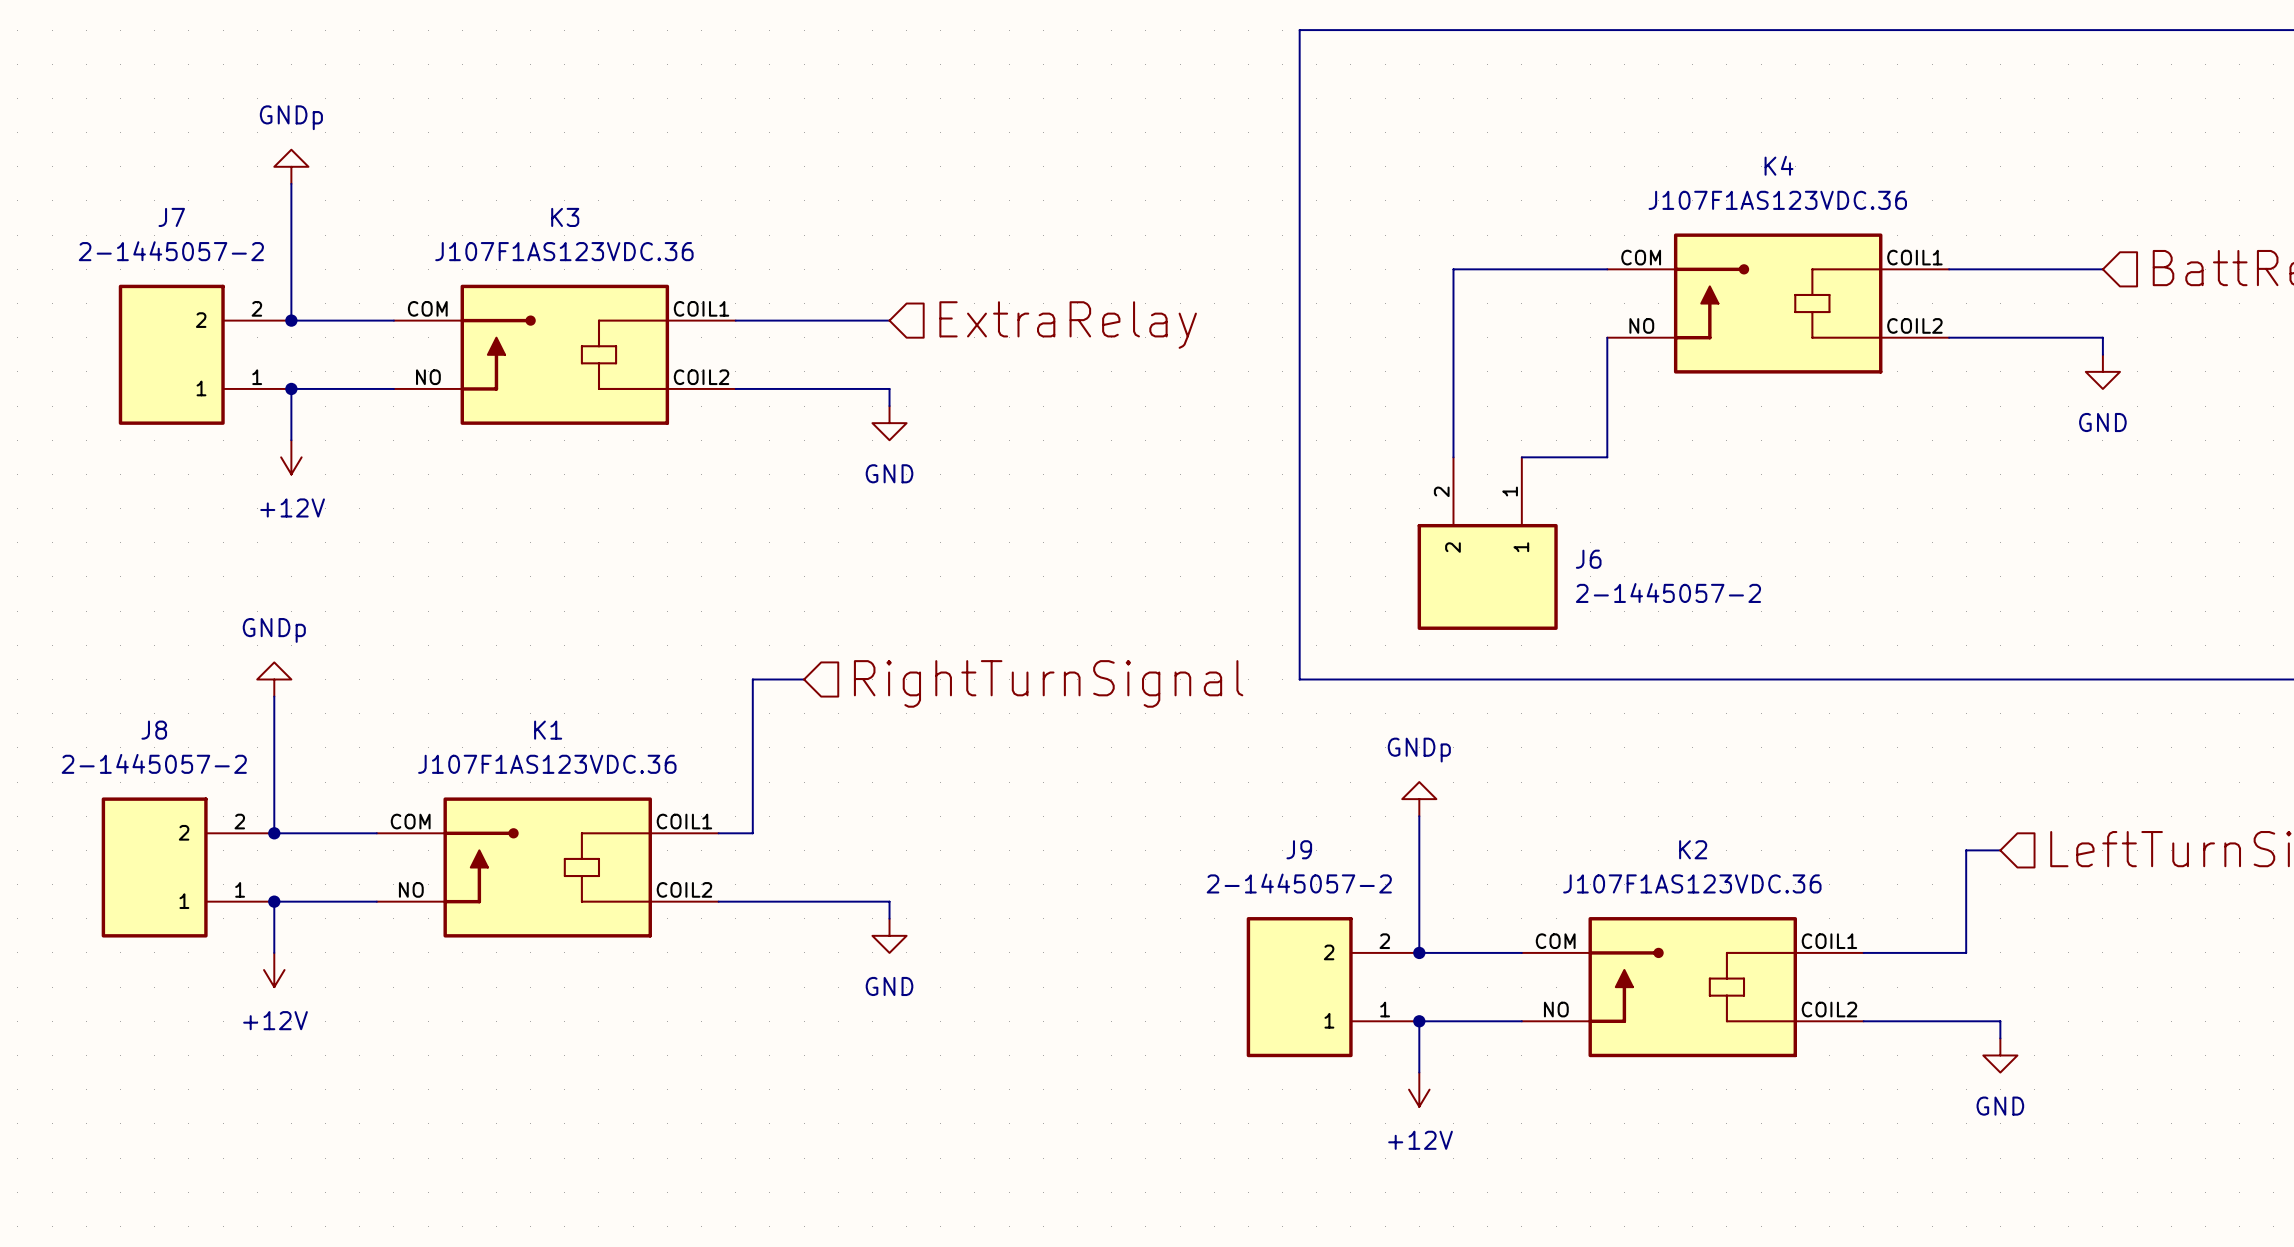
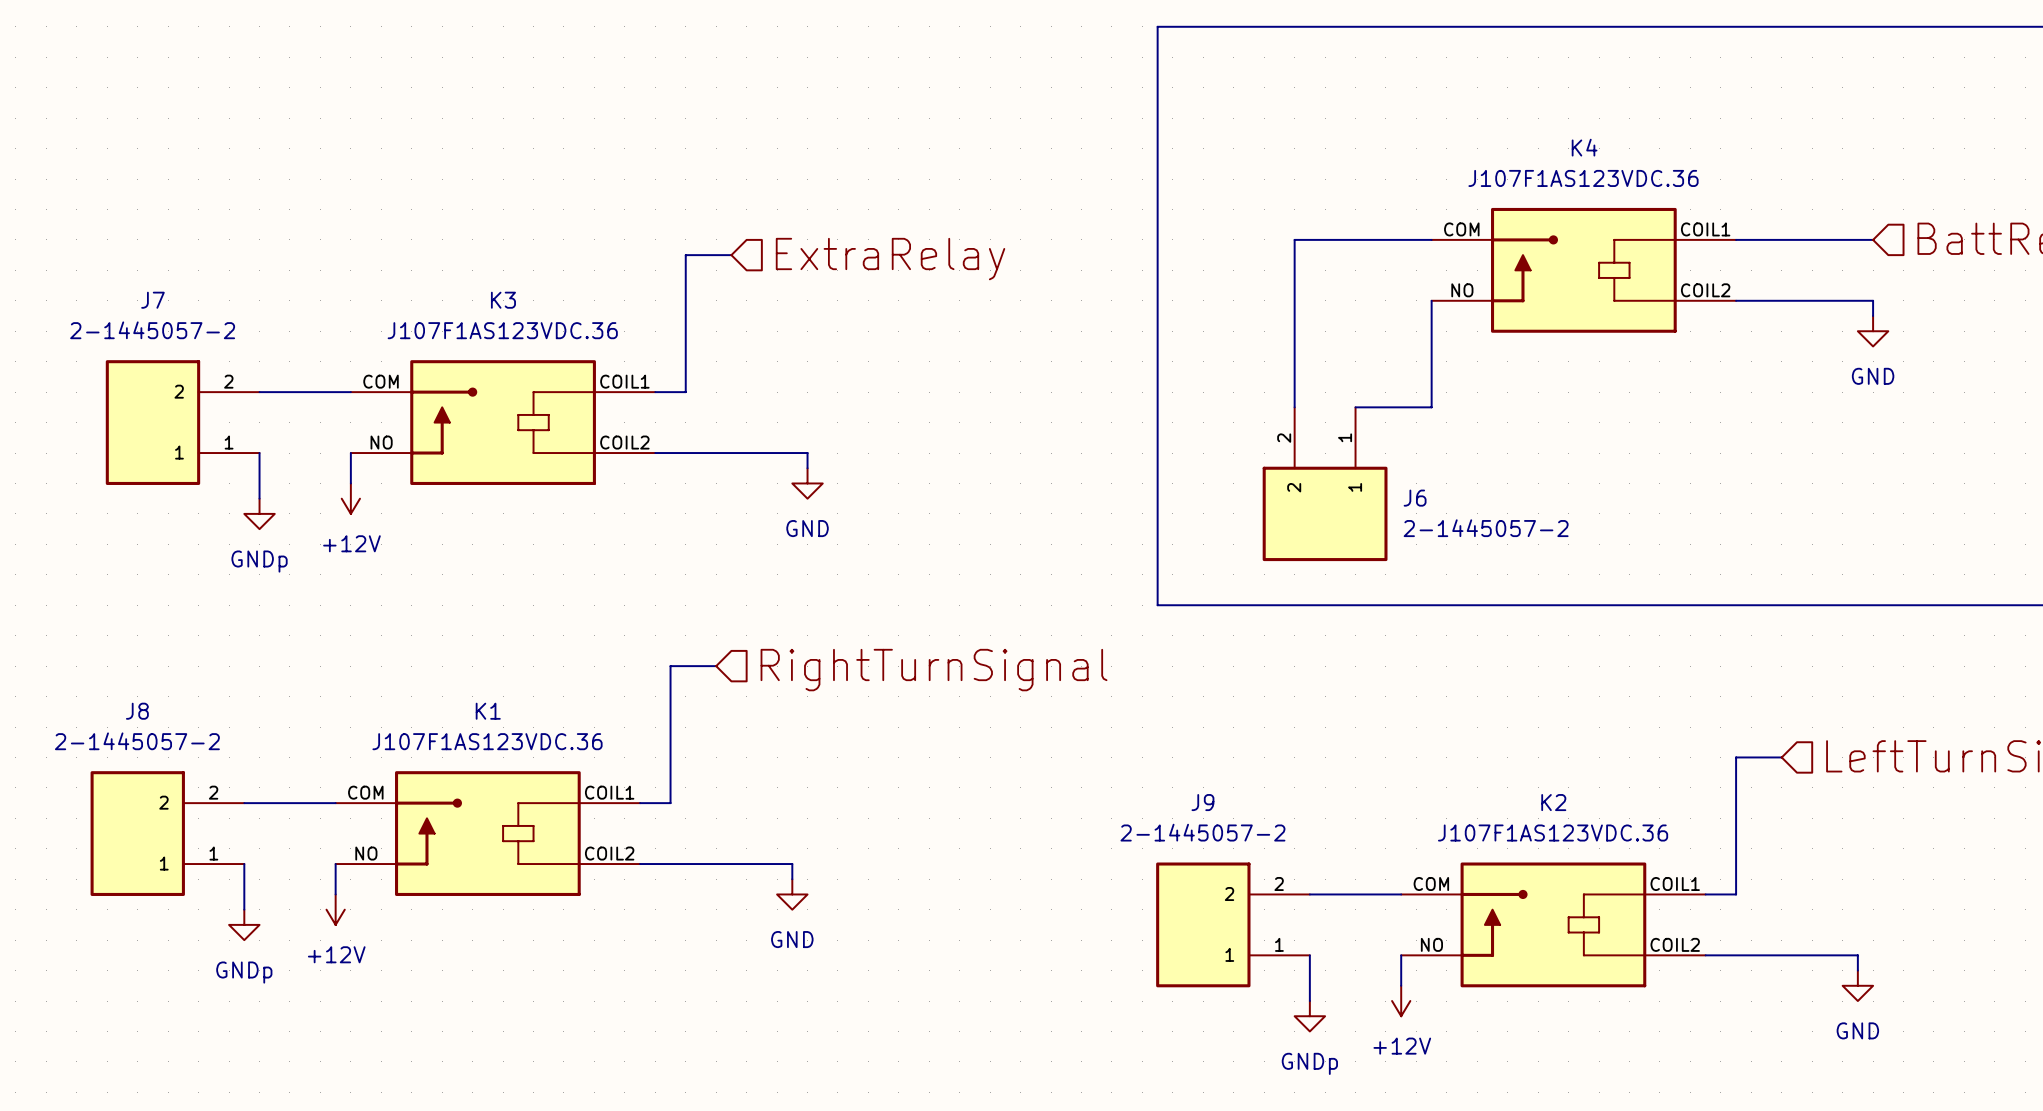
power symbol: GNDp (291, 166) -> none
wire: (291, 183) (291, 320) (393, 320) -> none
wire: none -> (731, 255) (685, 255) (685, 392) (655, 392)
junction: (291, 320) -> none
wire: (735, 320) (889, 320) -> none
hierarchical label position: ExtraRelay (1068, 325) -> ExtraRelay (890, 259)
J7 position: (205, 354) -> (182, 422)
K3 position: (564, 354) -> (503, 422)
junction: (291, 388) -> none
wire: (393, 388) (291, 388) (291, 440) -> (350, 392) (259, 392)
wire: (735, 388) (889, 388) (889, 406) -> none
power symbol position: GND (889, 423) -> GND (807, 483)
power symbol position: +12V (291, 457) -> +12V (350, 498)
wire: none -> (259, 453) (259, 498)
wire: none -> (350, 453) (350, 483)
wire: none -> (655, 453) (807, 453) (807, 468)
power symbol rotation: 0° (274, 679) -> 180° (259, 513)
power symbol position: GNDp (274, 679) -> GNDp (259, 513)
wire: (804, 679) (752, 679) (752, 747) -> (716, 666) (670, 666)
hierarchical label position: RightTurnSignal (1048, 683) -> RightTurnSignal (934, 670)
wire: (274, 696) (274, 833) (376, 833) -> none
power symbol: GNDp (1419, 799) -> none
wire: (1419, 816) (1419, 952) (1521, 952) -> none
junction: (274, 833) -> none
wire: (718, 833) (752, 833) -> (670, 803) (670, 742)
wire: (1966, 850) (1966, 952) (1863, 952) -> (1751, 757) (1736, 757) (1736, 894) (1705, 894)
J8 position: (187, 867) -> (167, 833)
K1 position: (547, 867) -> (487, 833)
wire: (274, 901) (274, 952) -> (244, 864) (244, 909)
junction: (274, 901) -> none
wire: (752, 901) (889, 901) (889, 918) -> none
power symbol position: GND (889, 935) -> GND (792, 894)
junction: (1419, 952) -> none
power symbol position: +12V (274, 970) -> +12V (335, 909)
wire: none -> (335, 864) (335, 894)
wire: none -> (640, 864) (792, 864) (792, 879)
J9 position: (1333, 987) -> (1232, 924)
K2 position: (1692, 987) -> (1553, 924)
wire: none -> (1309, 894) (1401, 894)
junction: (1419, 1021) -> none
wire: (1521, 1021) (1419, 1021) (1419, 1072) -> none
wire: (1863, 1021) (2000, 1021) (2000, 1038) -> none
power symbol: none -> GNDp (244, 924)
power symbol position: GND (2000, 1055) -> GND (1857, 985)
wire: none -> (1309, 955) (1309, 1001)
wire: none -> (1401, 955) (1401, 985)
wire: none -> (1705, 955) (1857, 955) (1857, 970)
power symbol position: +12V (1419, 1089) -> +12V (1401, 1001)
power symbol: none -> GNDp (1309, 1016)

